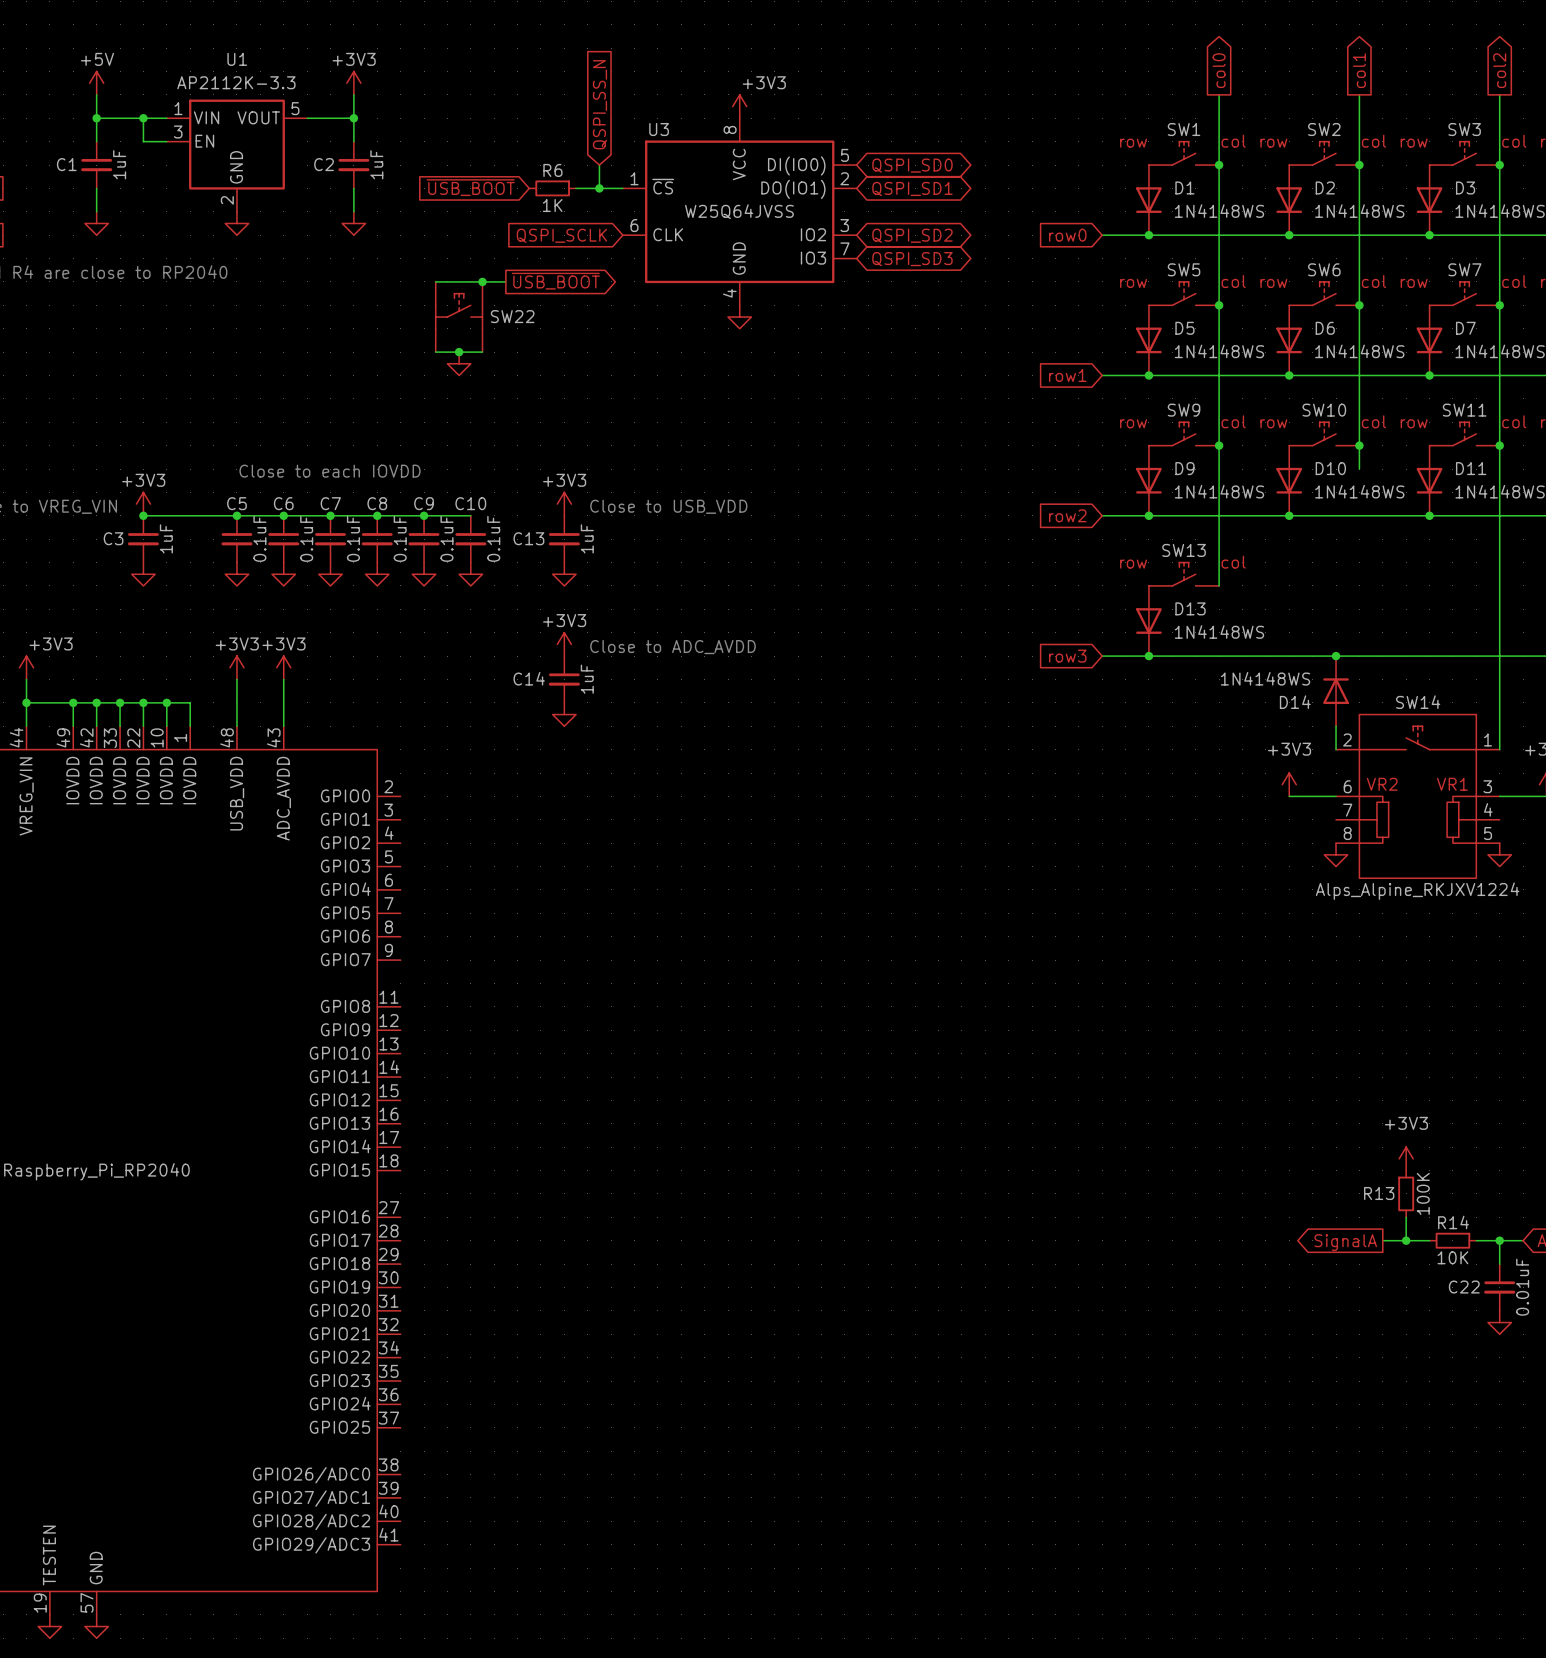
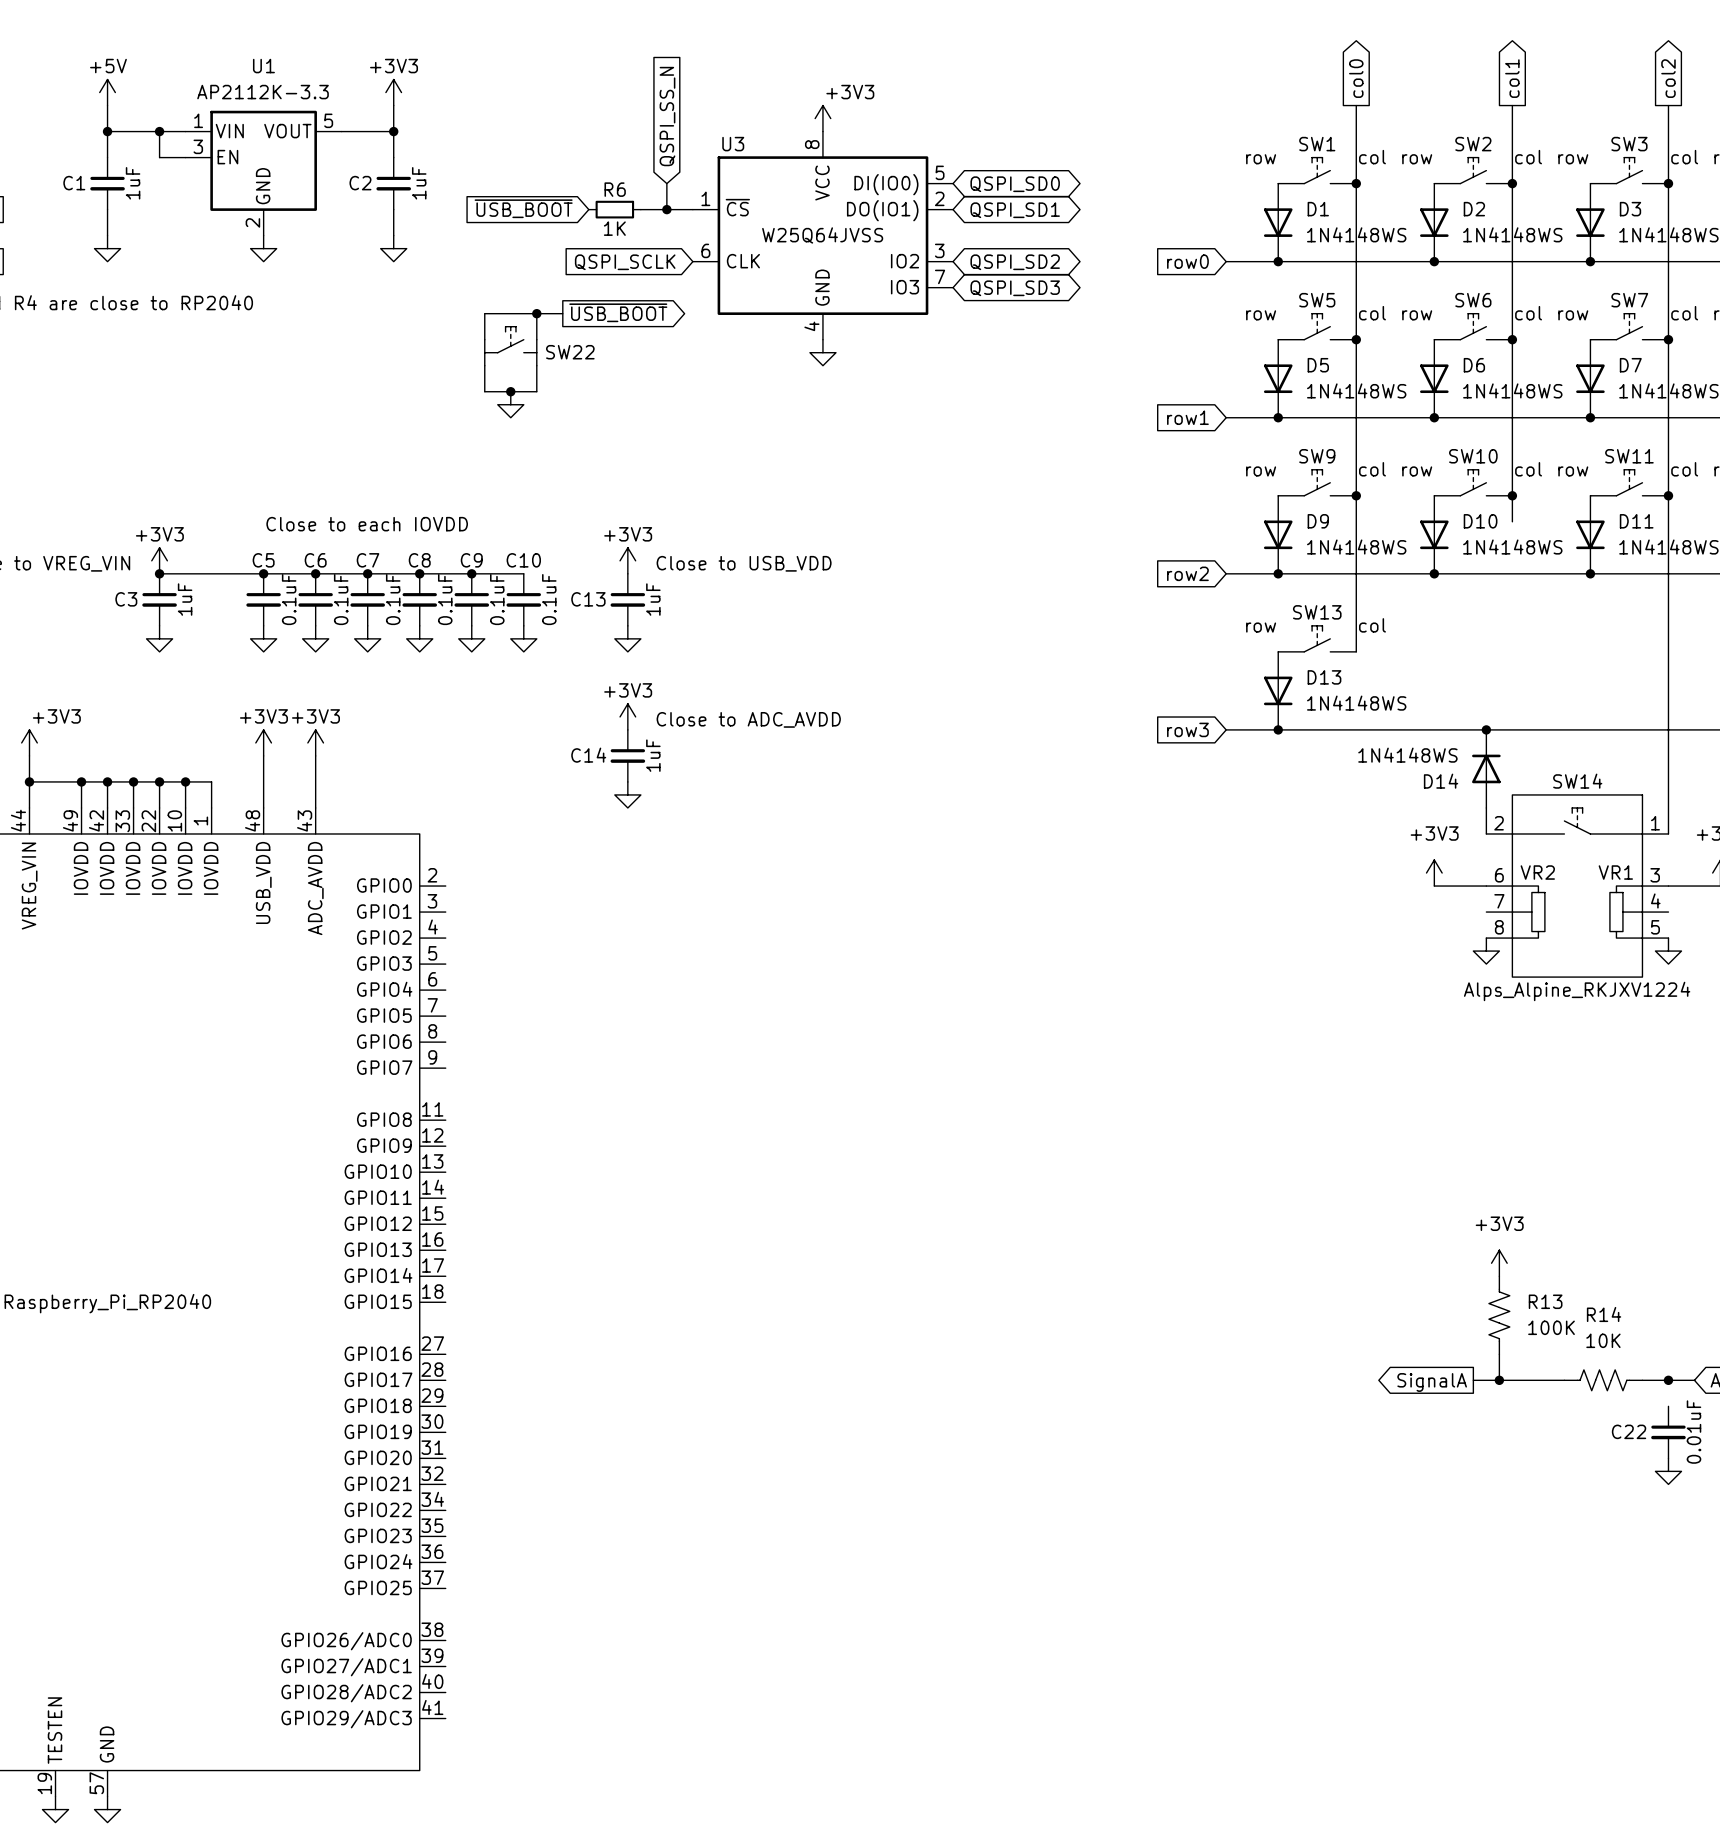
power symbol position: +3V3 (1406, 1158) -> +3V3 (1499, 1263)
R13 symbol: [1398, 1170, 1415, 1218] -> [1488, 1276, 1510, 1355]
R13 name position: R13 (1379, 1193) -> R13 (1545, 1301)
R13 value position: 100K (1423, 1193) -> 100K (1551, 1327)
wire: (1406, 1217) (1406, 1240) (1429, 1240) -> none
R14 name position: R14 (1453, 1222) -> R14 (1604, 1314)
R14 symbol: [1429, 1232, 1477, 1249] -> [1564, 1369, 1643, 1391]
wire: none -> (1473, 1380) (1538, 1380)
junction: none -> (1499, 1380)
junction: (1406, 1240) -> none
wire: (1499, 1240) (1499, 1264) -> (1499, 1354) (1499, 1380)
global label position: SignalA (1345, 1242) -> SignalA (1432, 1382)
R14 value position: 10K (1452, 1257) -> 10K (1603, 1340)

